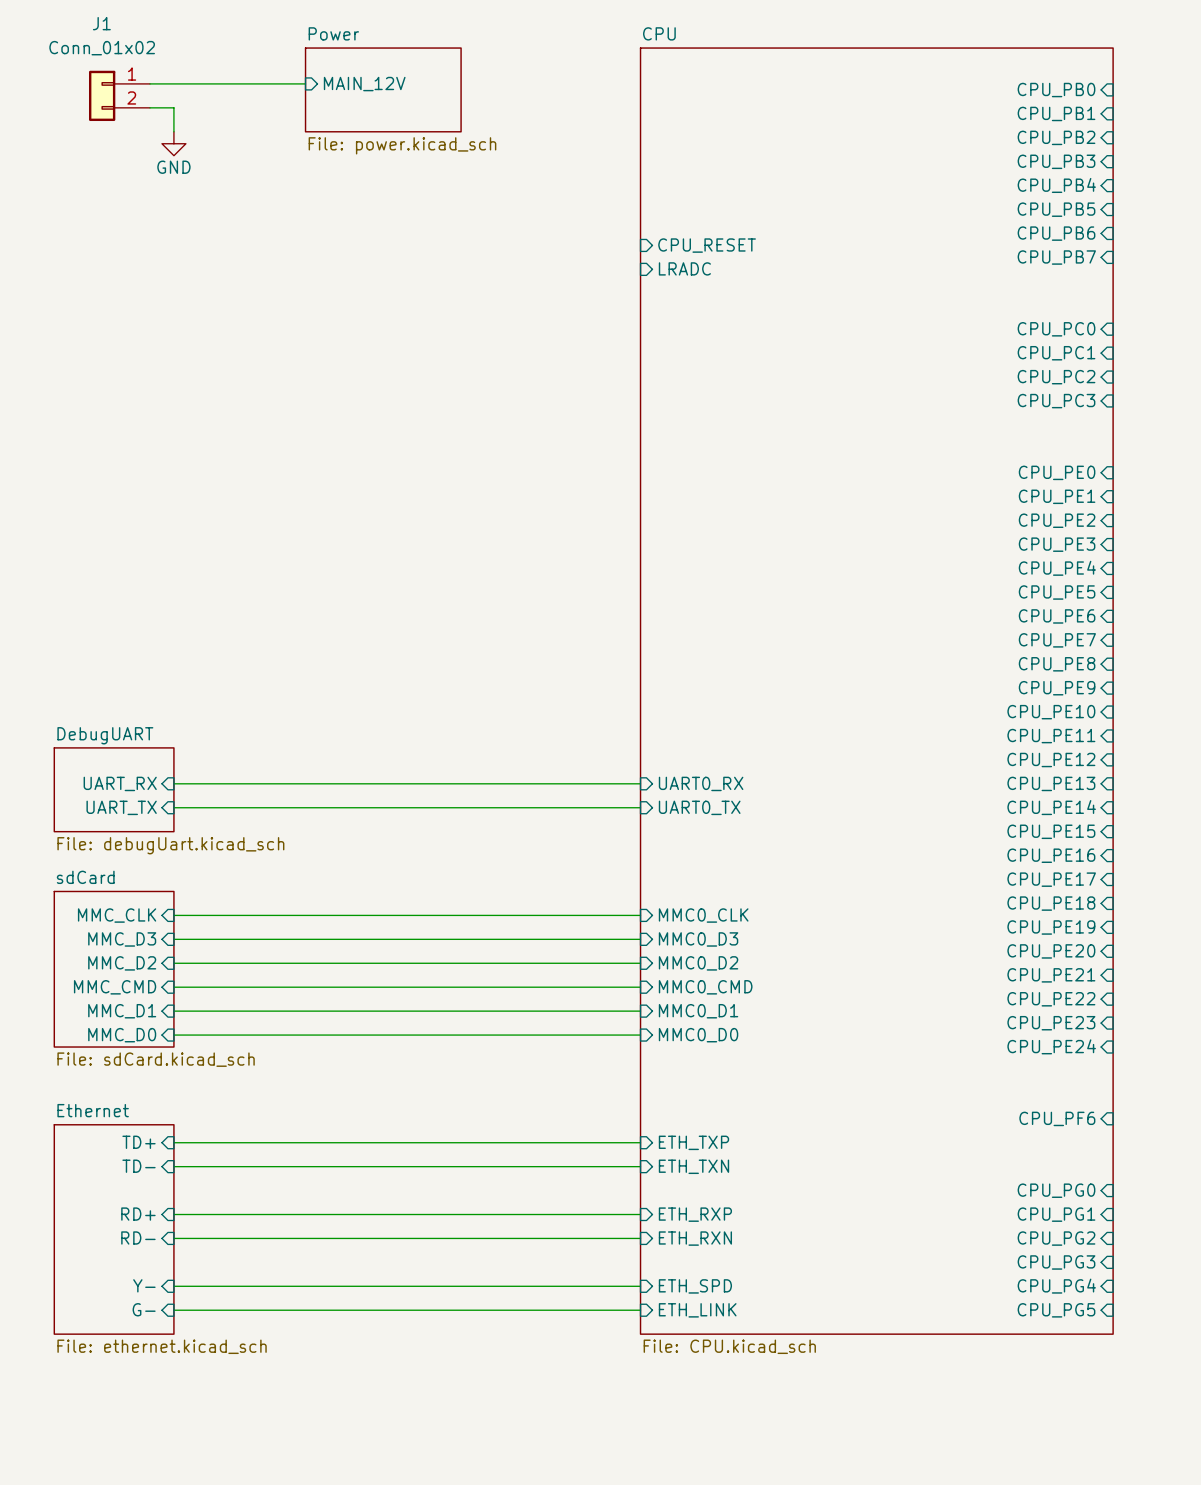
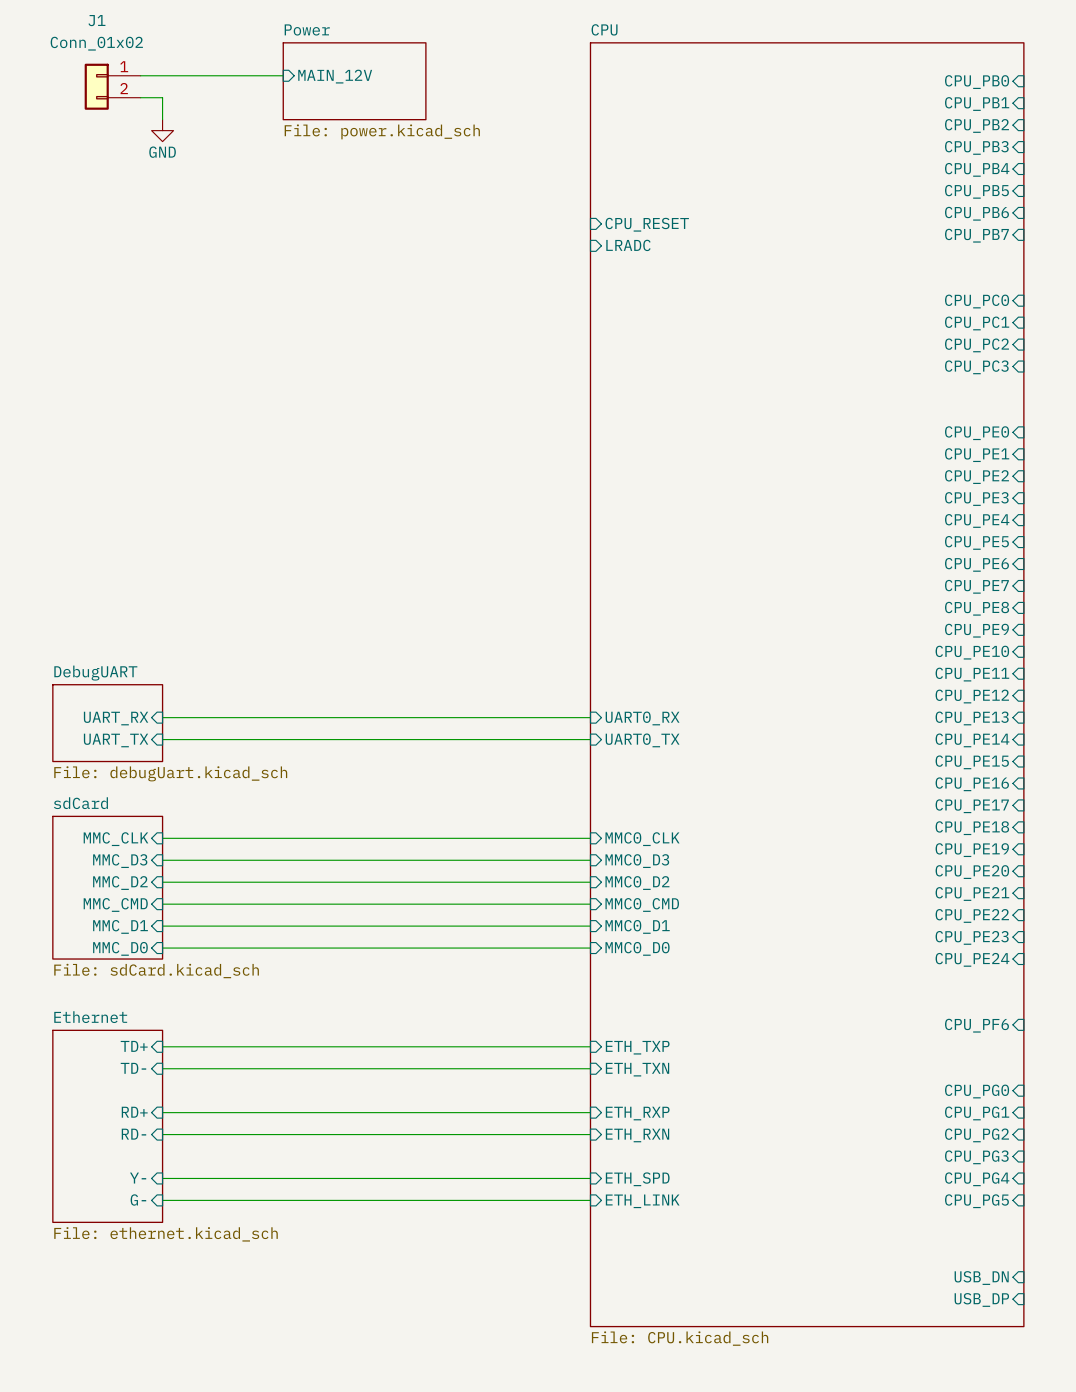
sheet CPU: File: CPU.kicad_sch (876, 691) -> none
sheet CPU: none -> File: CPU.kicad_sch (807, 684)
sheet pin: none -> USB_DN (981, 1278)
sheet pin: none -> USB_DP (981, 1299)

